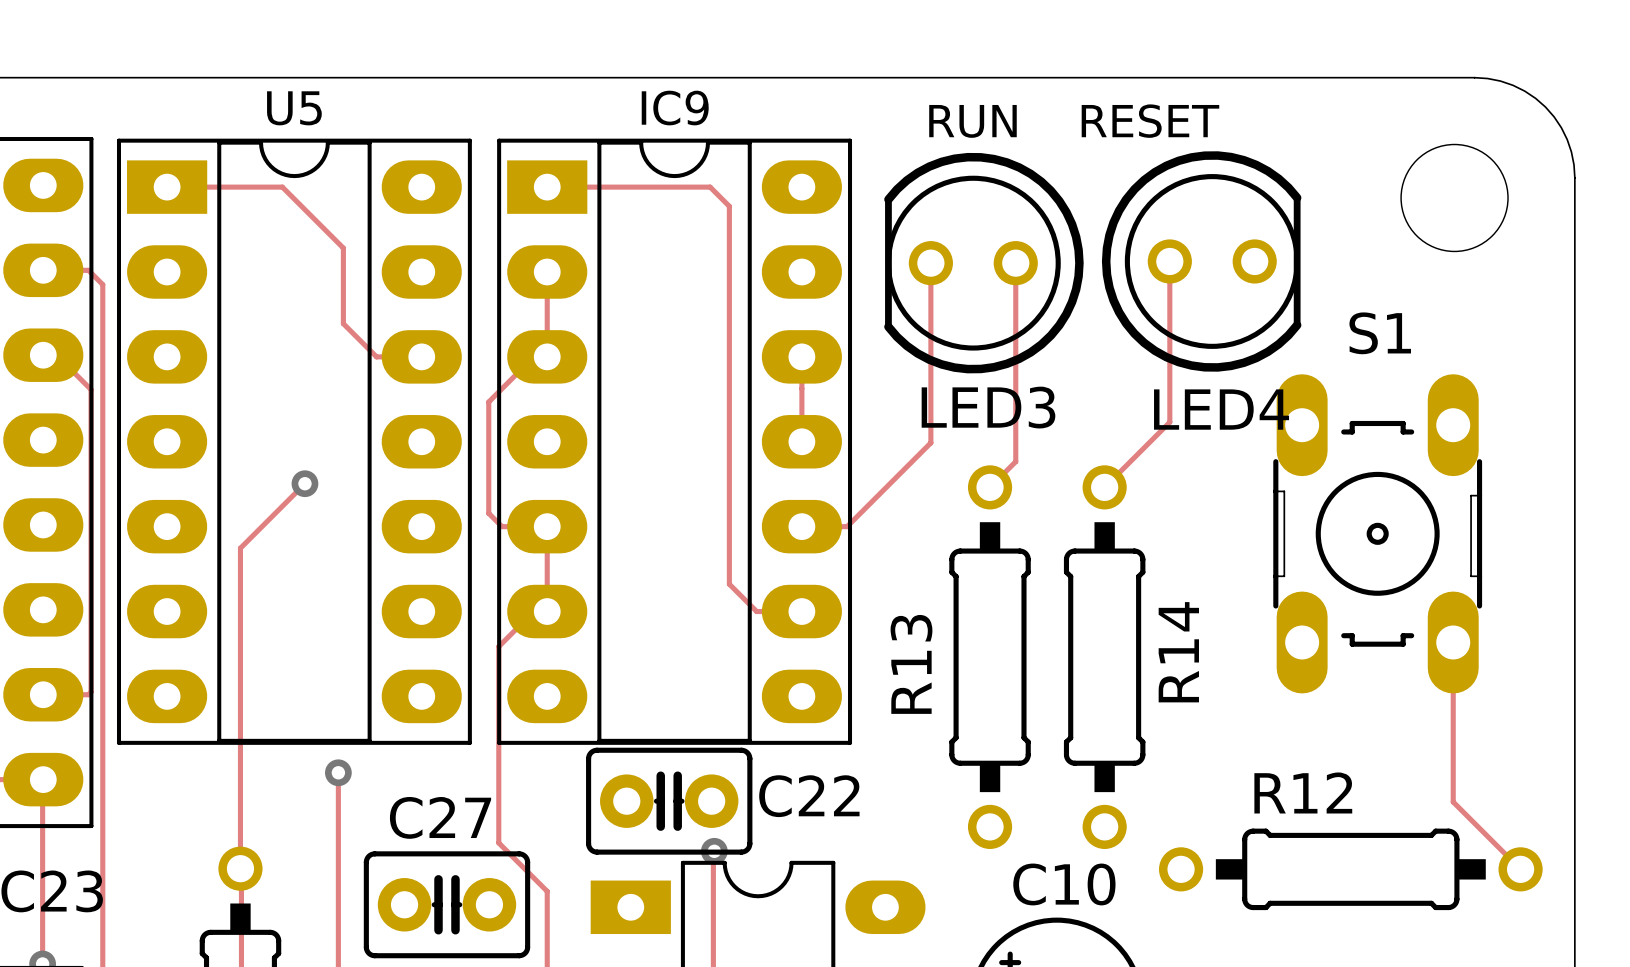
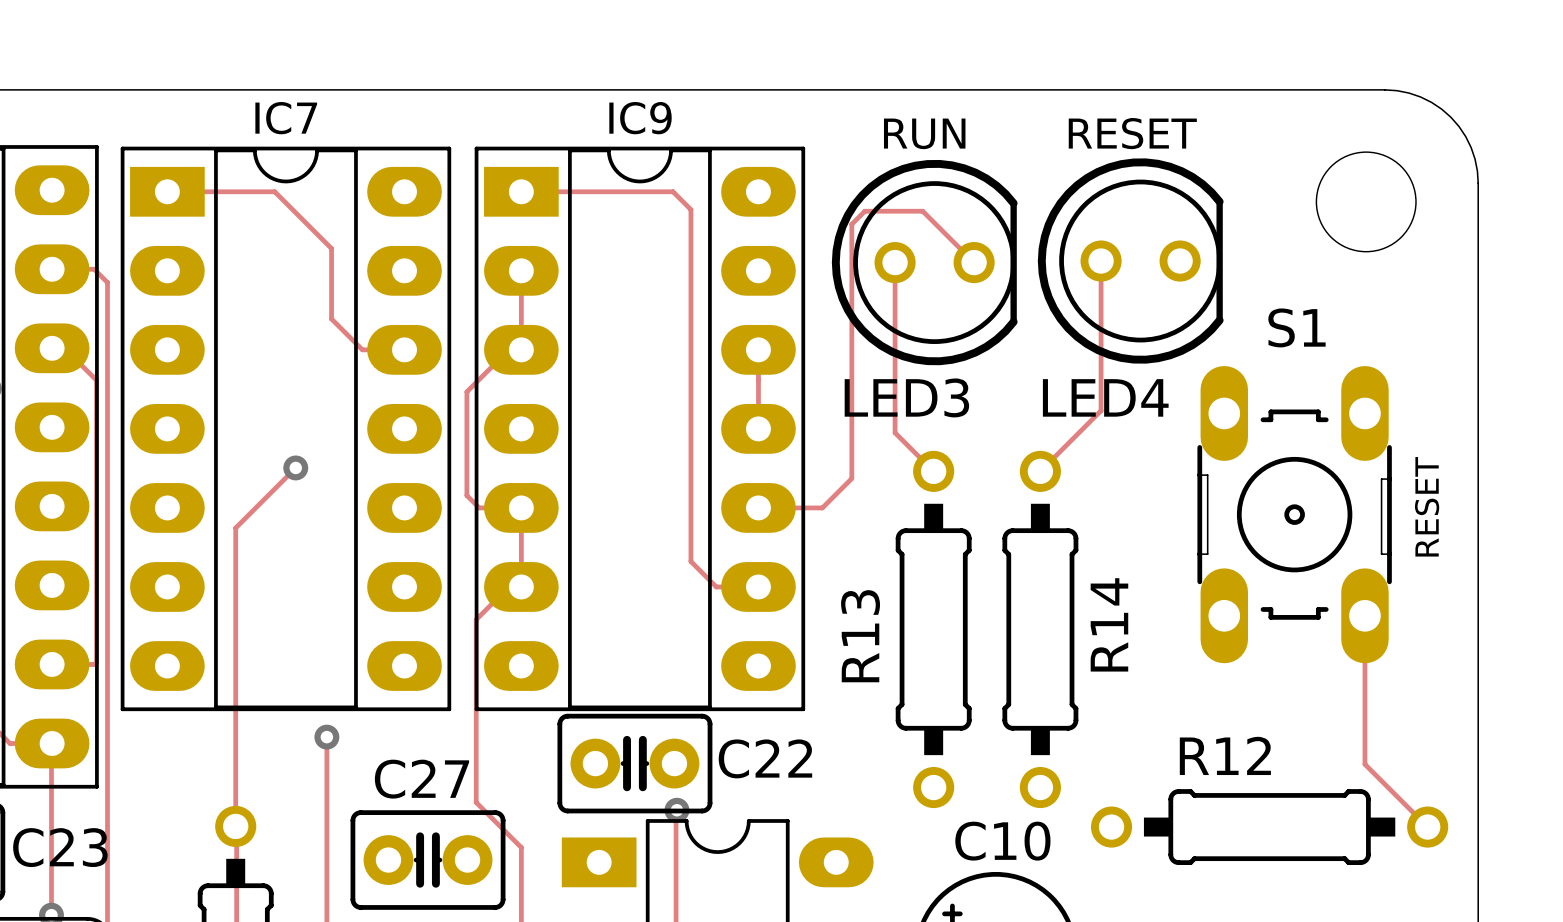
U5 name: U5 (294, 108) -> IC7 (286, 118)
text: RUN RESET (1074, 121) -> none
text: none -> RUN (924, 133)
text: none -> RESET (1132, 133)
track: (930, 263) (930, 442) (847, 526) -> (974, 262) (922, 211) (864, 211) (851, 224) (851, 478) (822, 507) (800, 507)
LED3 rotation: 0° (983, 263) -> 180° (924, 262)
track: (1015, 263) (1015, 461) (990, 487) -> (895, 262) (895, 432) (933, 471)
LED4 name position: LED4 (1221, 409) -> LED4 (1105, 397)
text: none -> RESET (1427, 506)

